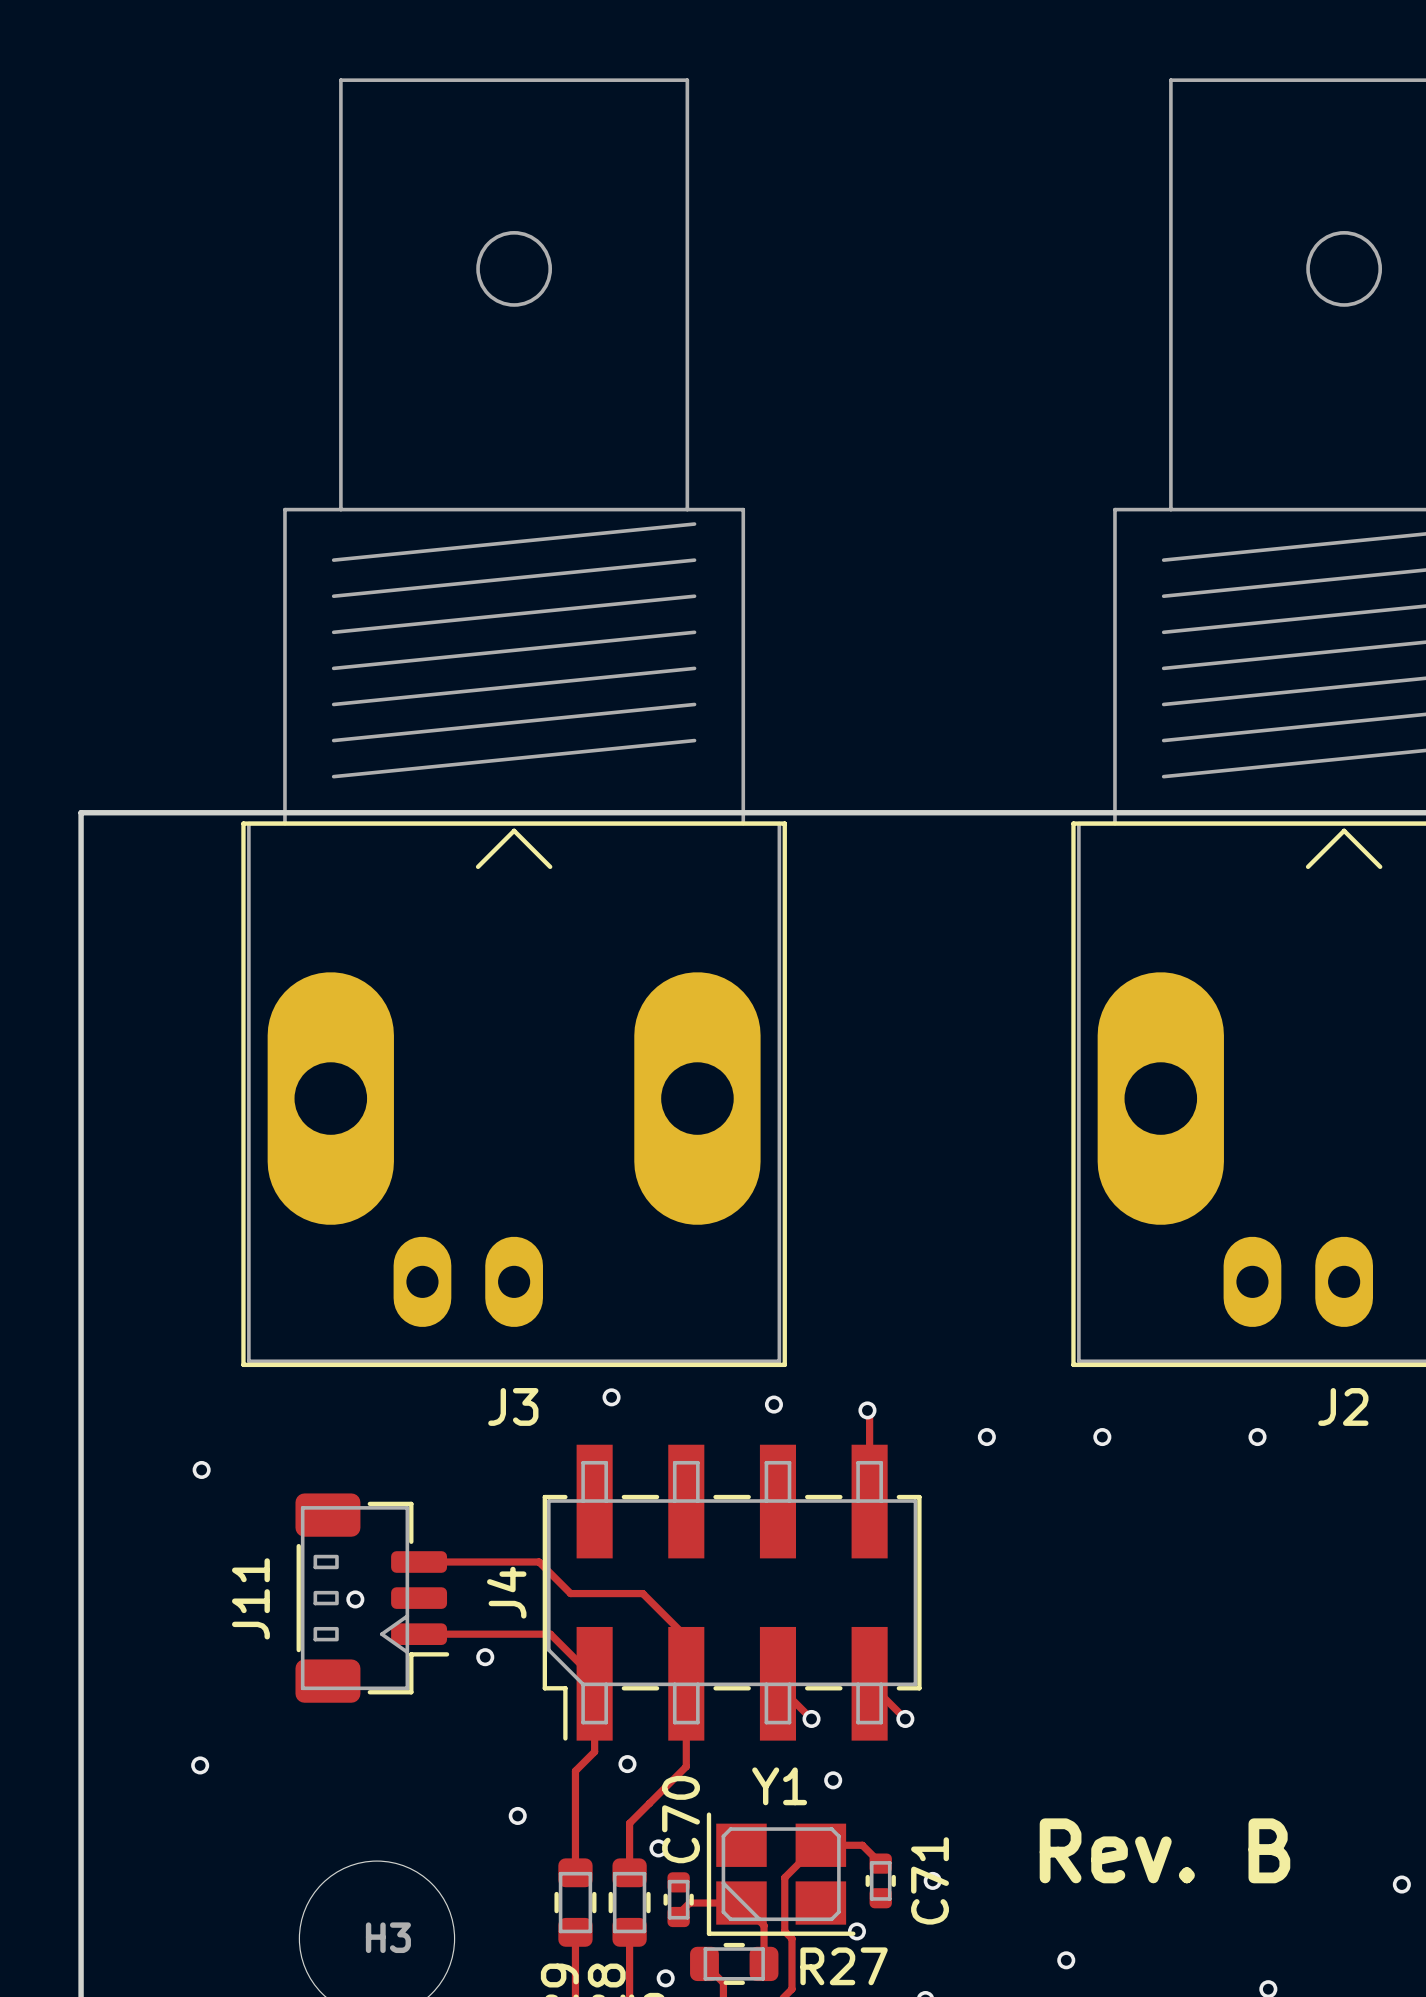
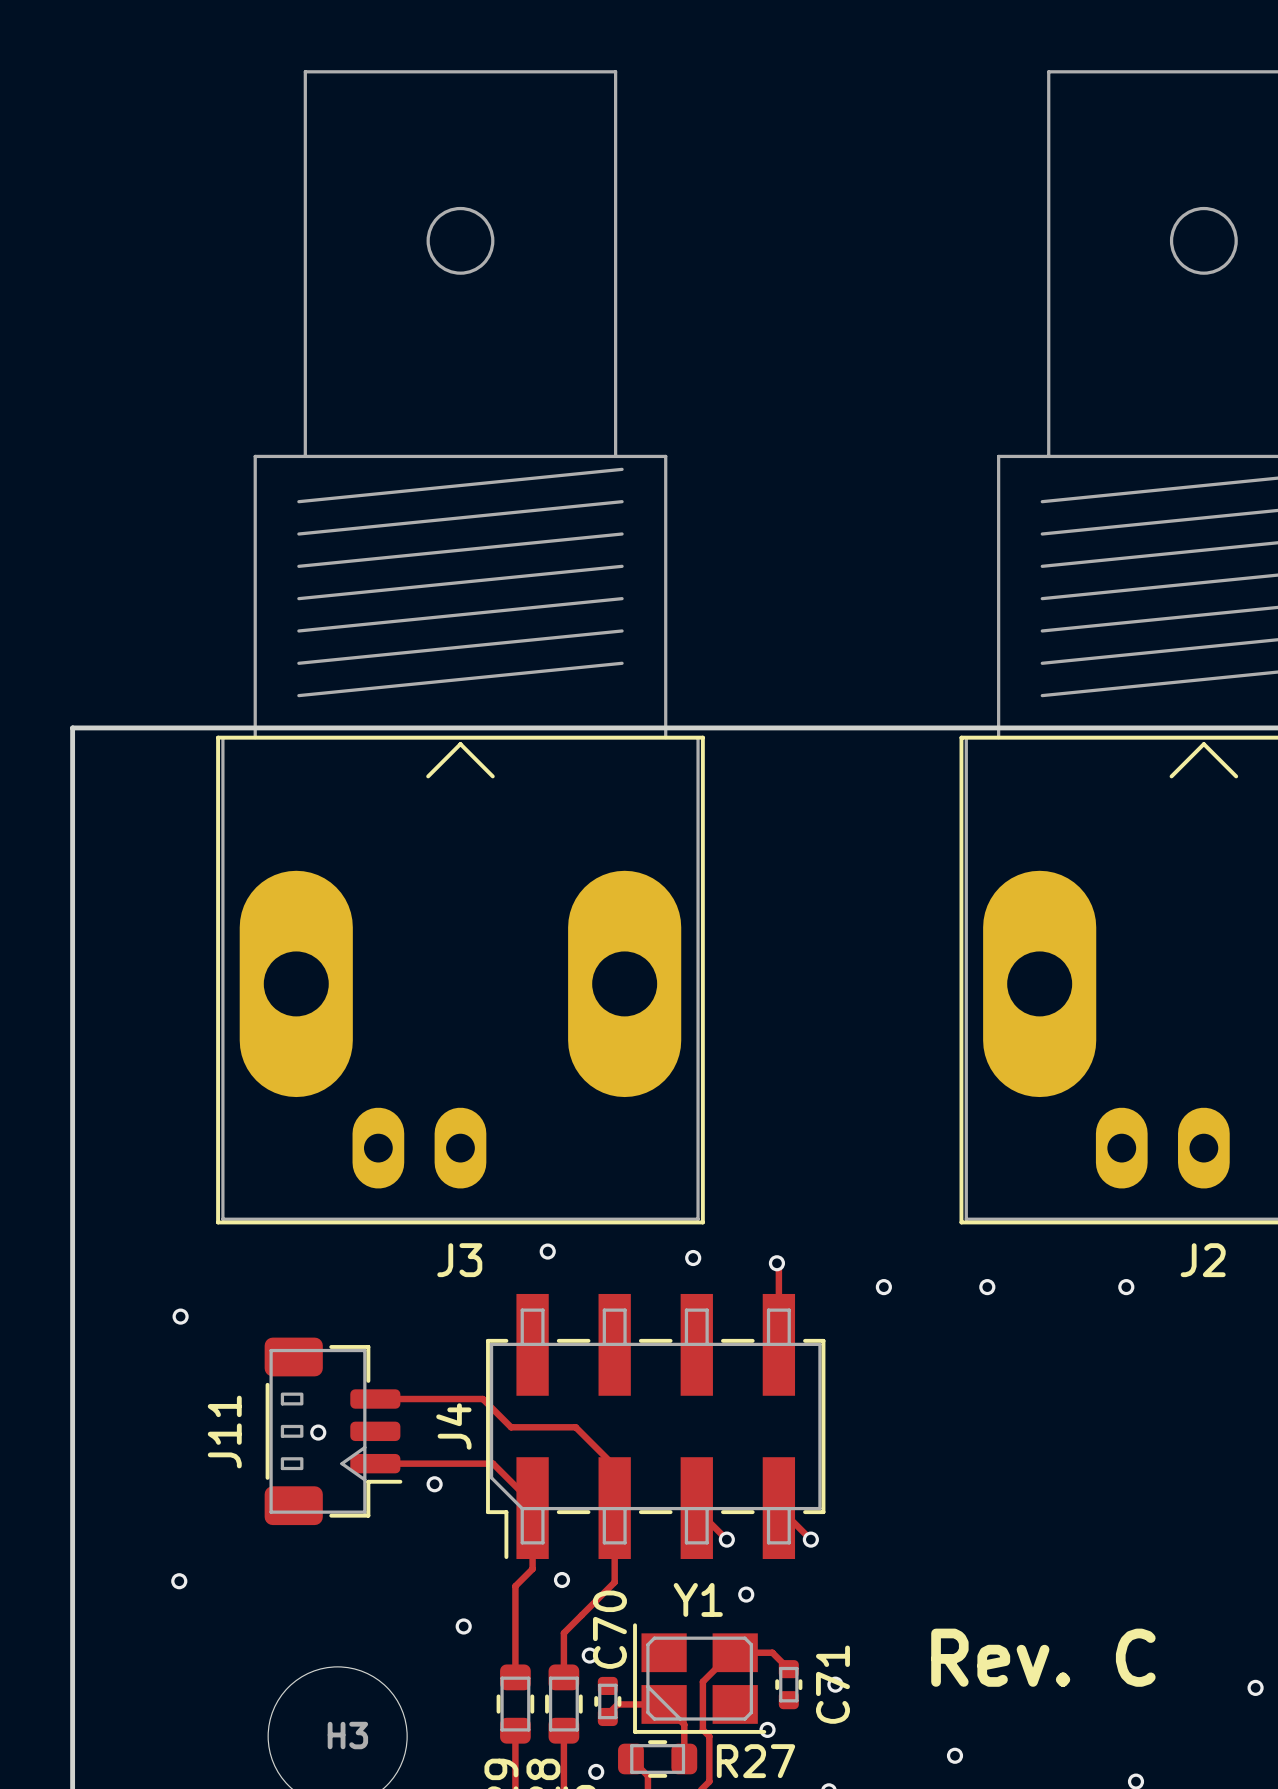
text: Rev. B (1164, 1850) -> Rev. C (1043, 1657)

